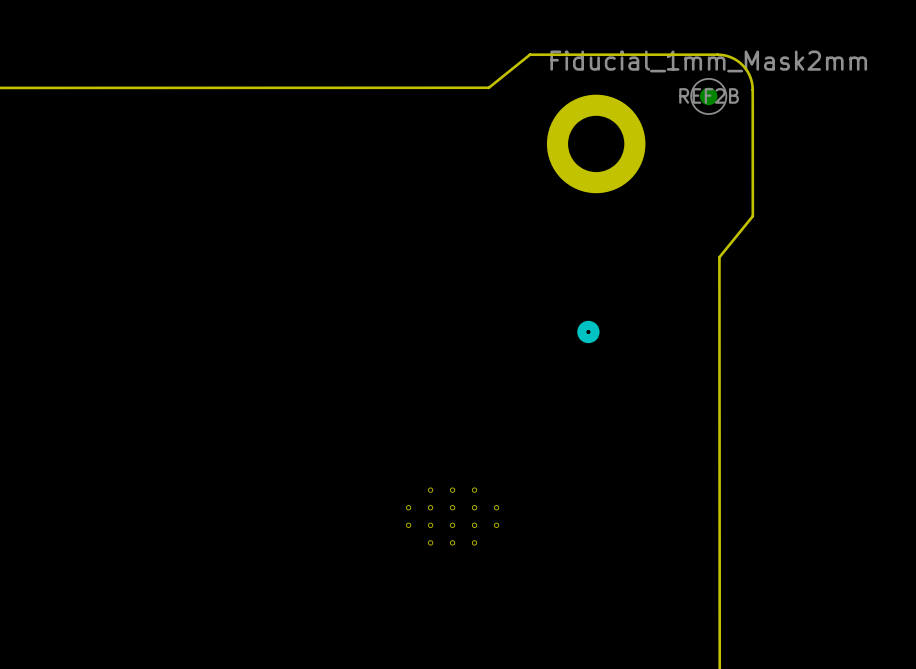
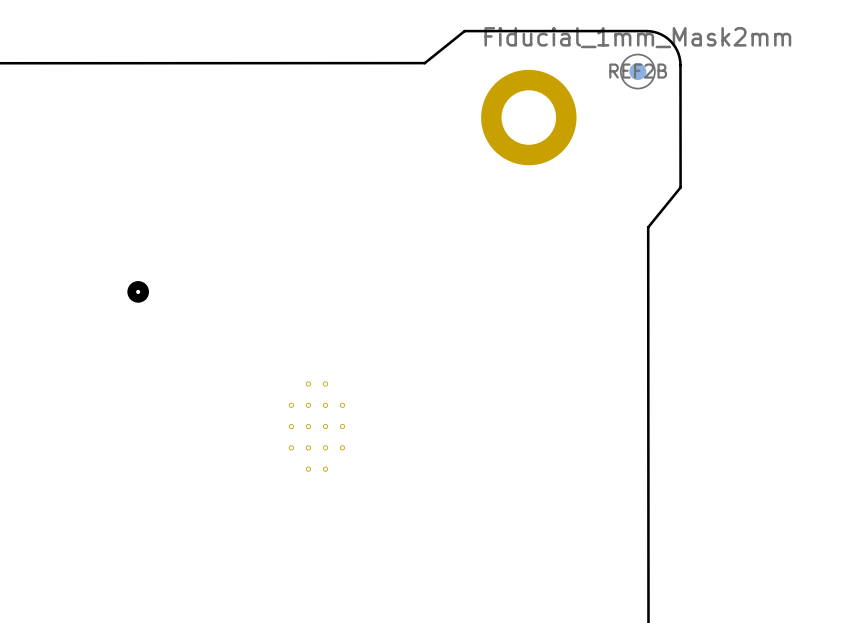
part position: (588, 331) -> (138, 291)
part rotation: 0° (452, 516) -> 90° clockwise (316, 426)
part position: (452, 516) -> (316, 426)

